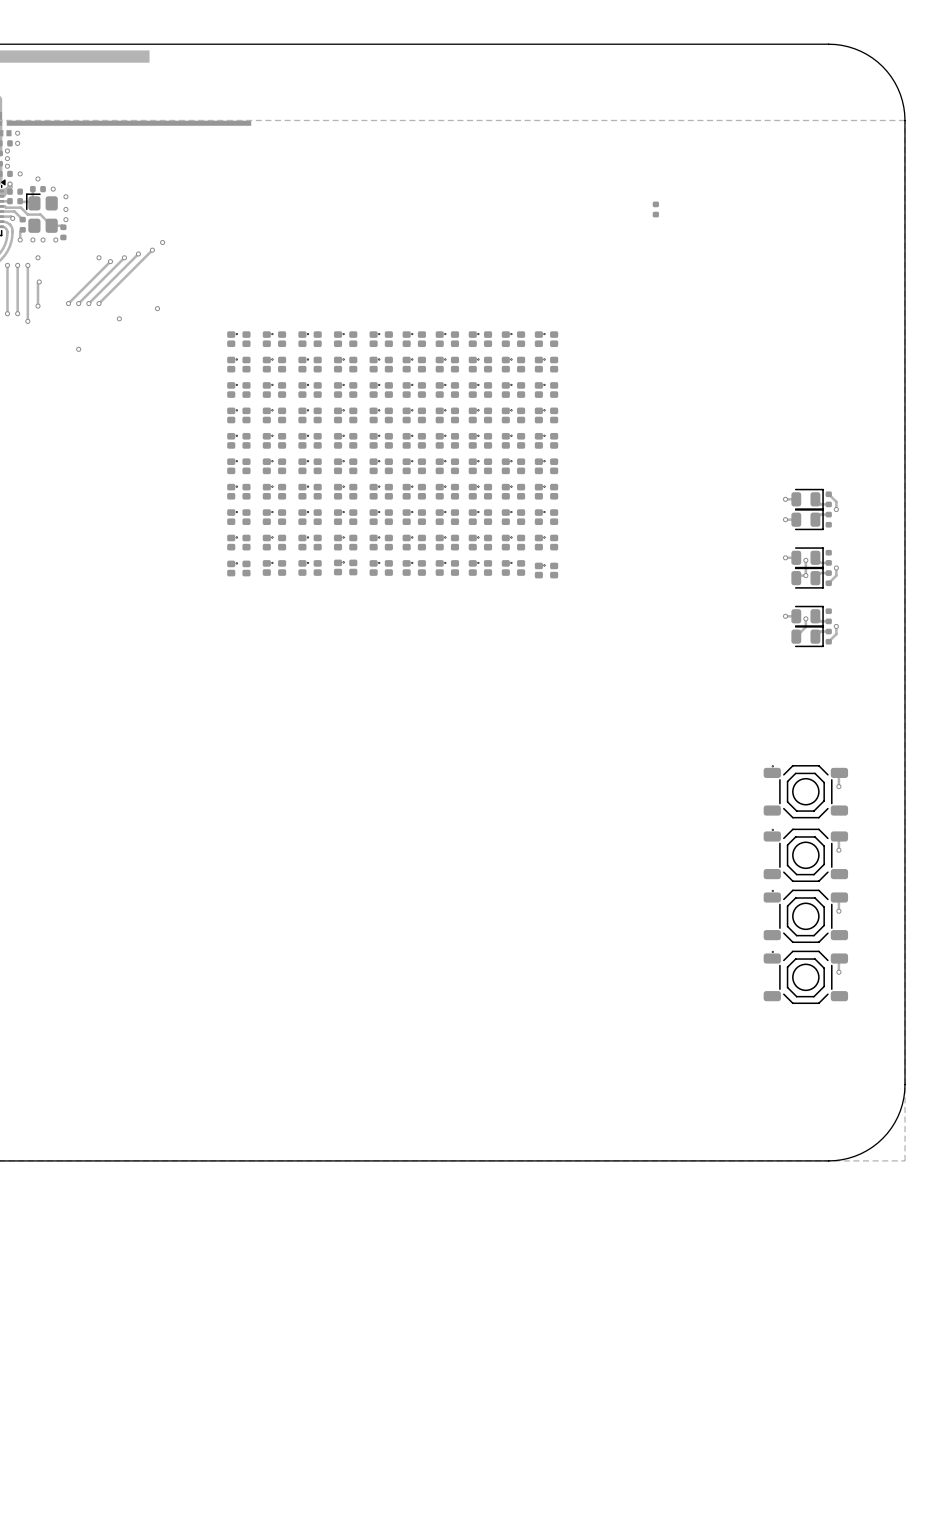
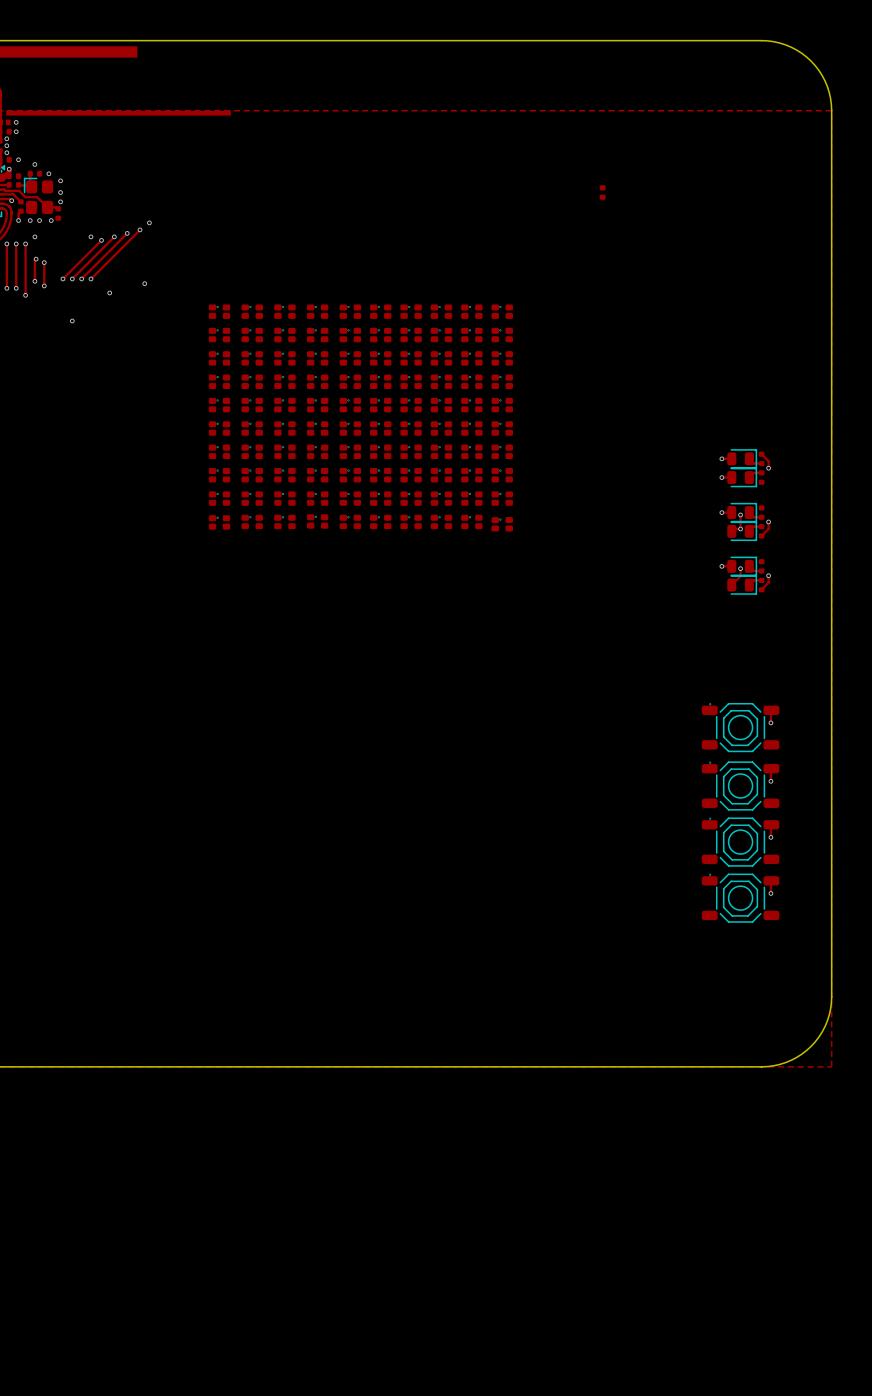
track: none -> (44, 262) (44, 285)
via: none -> (44, 262)
via: none -> (44, 285)

